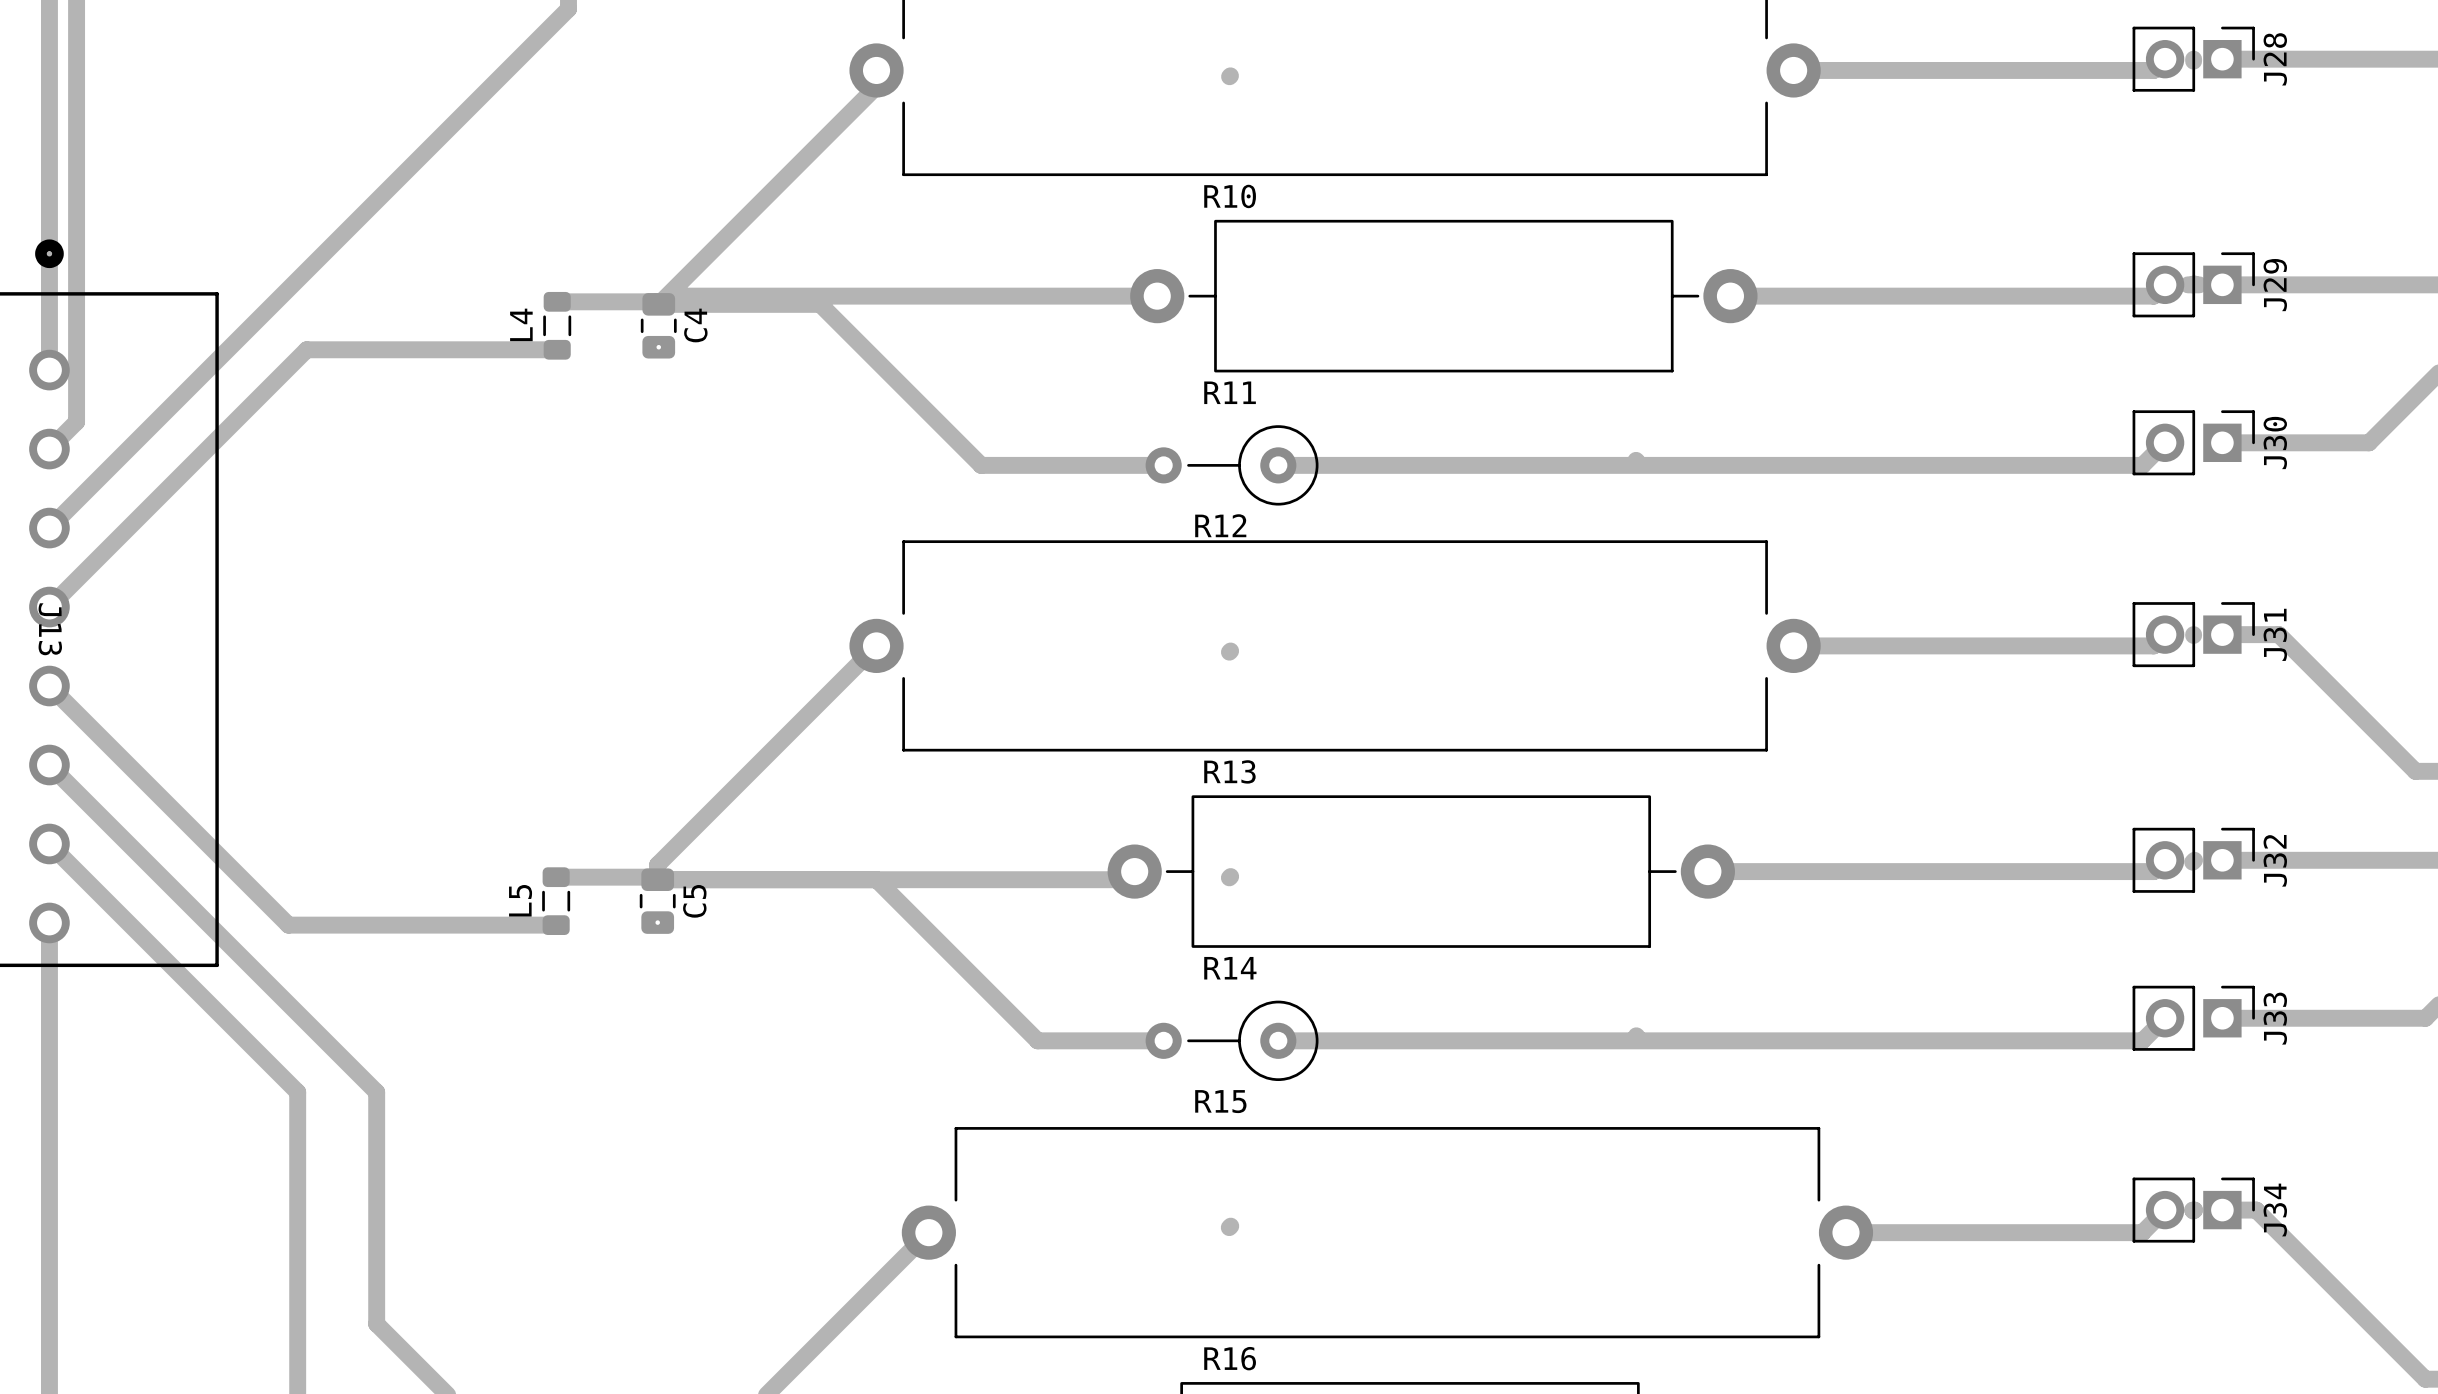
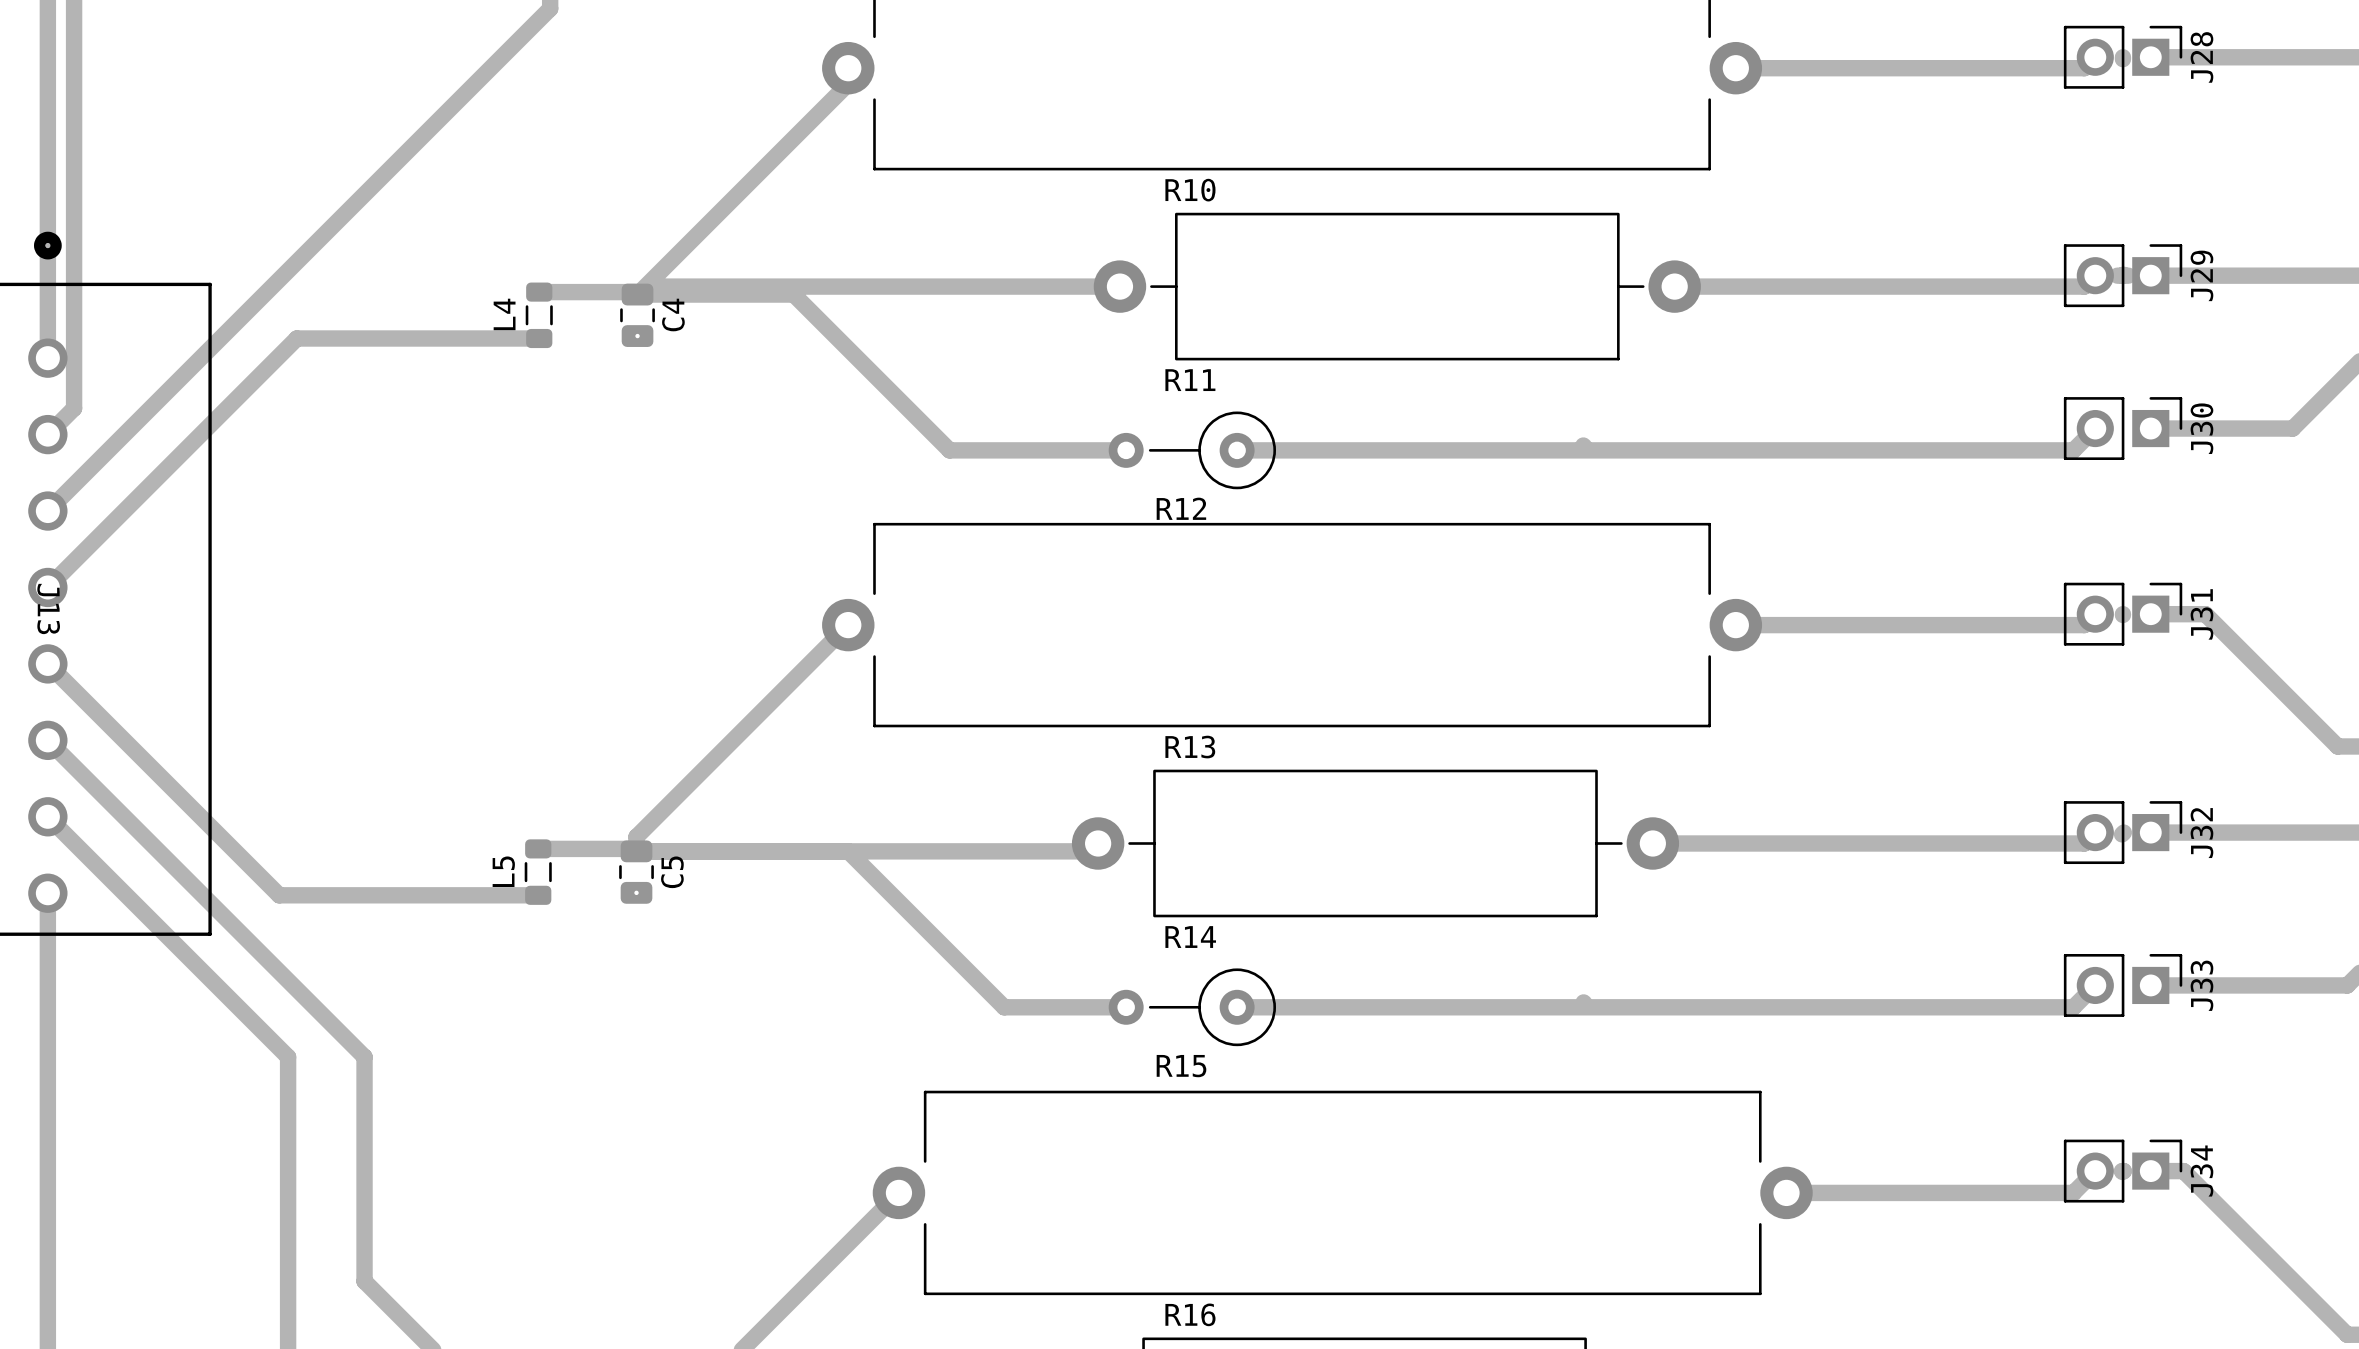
track: (1230, 75) (1229, 76) -> none
track: (1230, 650) (1229, 652) -> none
track: (1230, 876) (1229, 877) -> none
track: (1230, 1226) (1229, 1227) -> none

